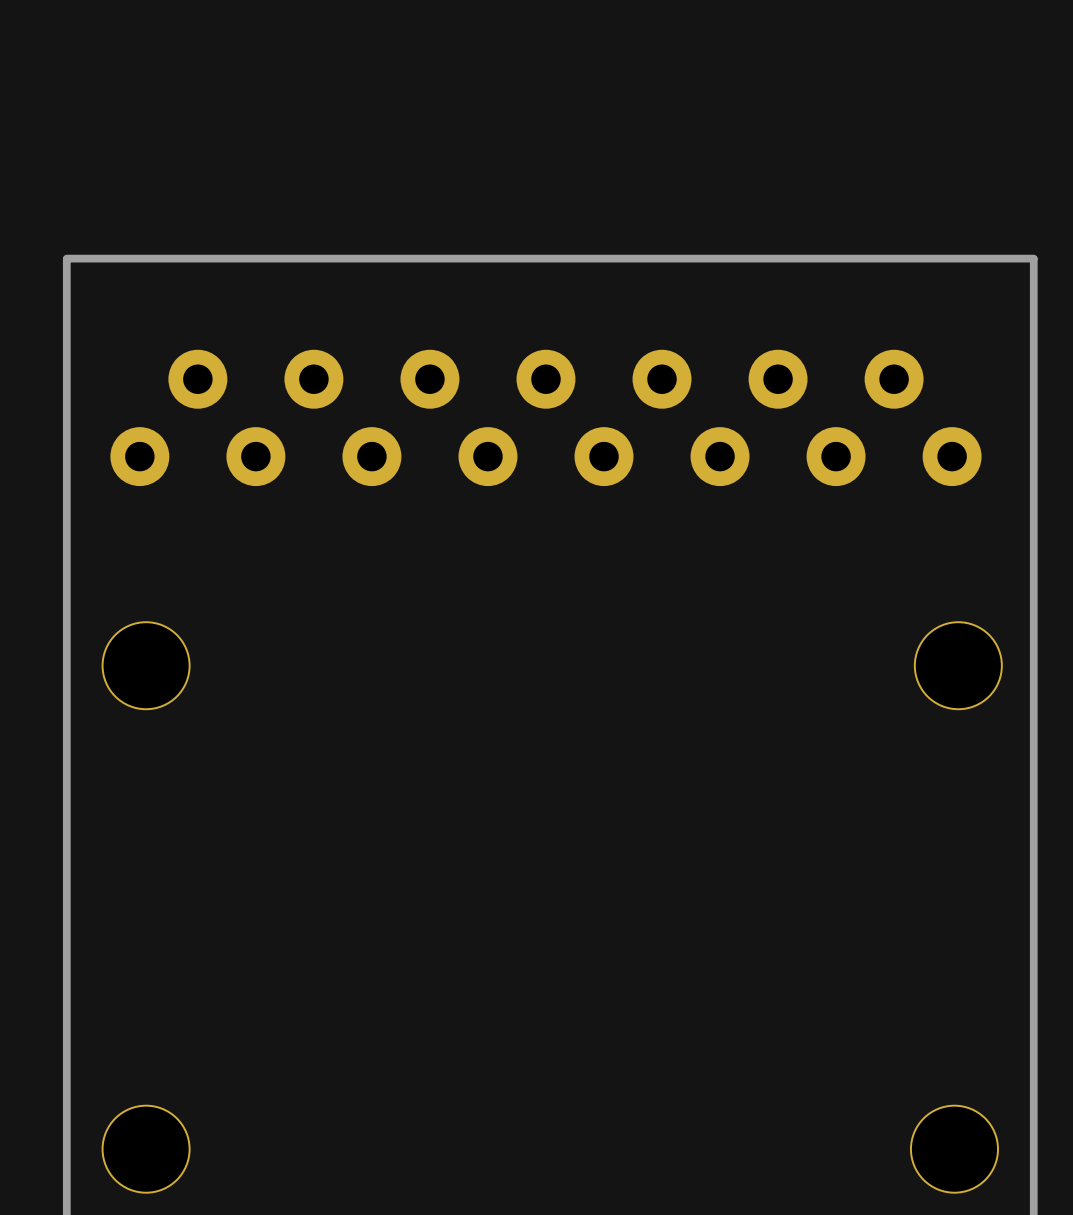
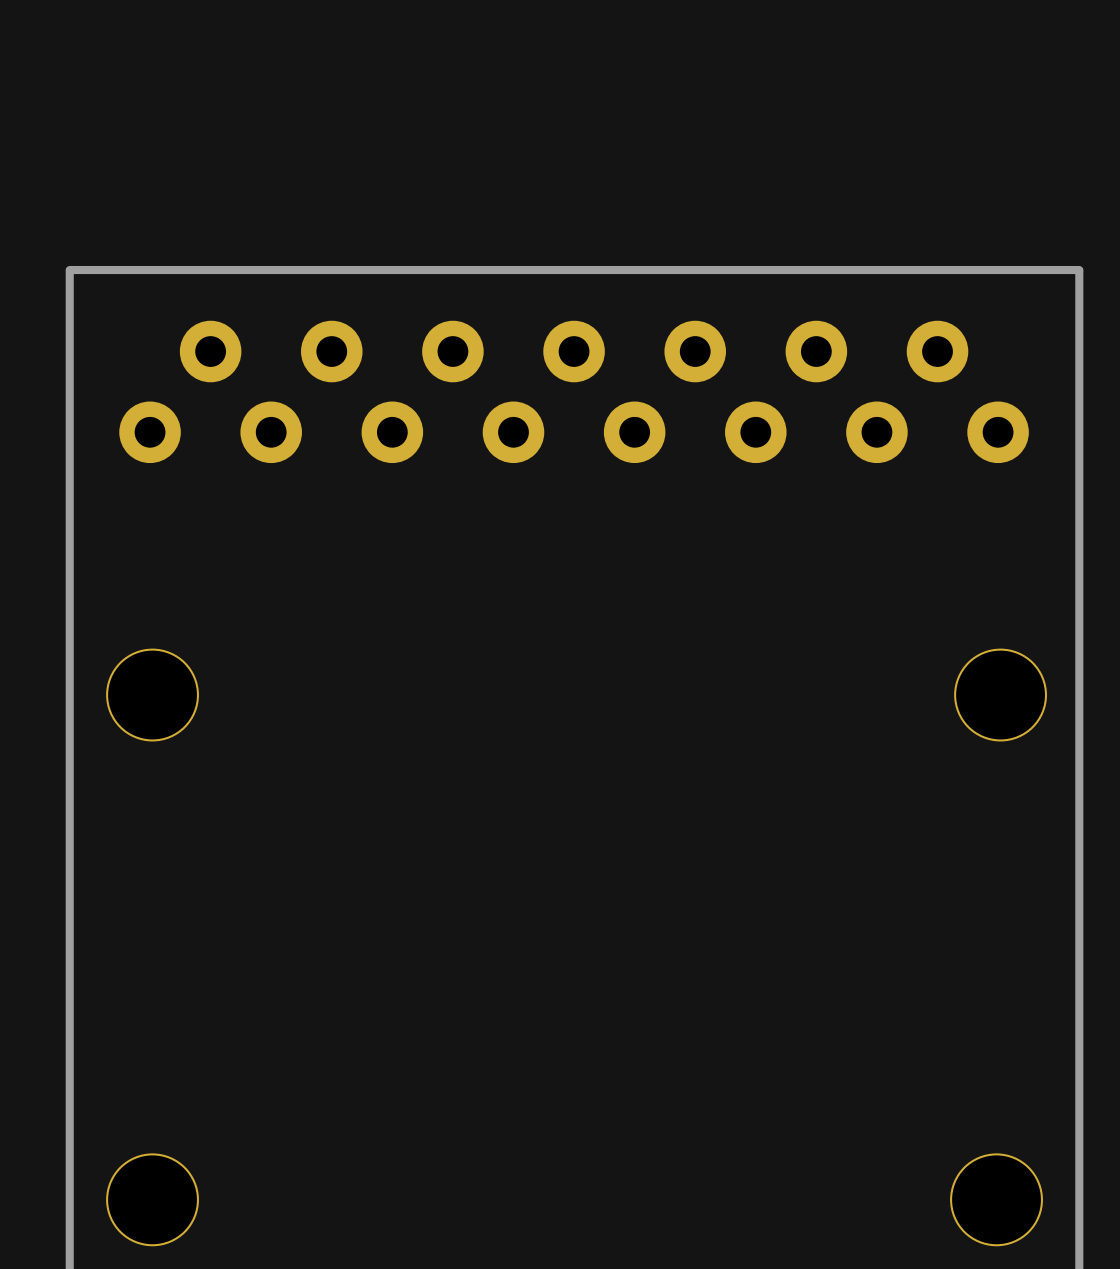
part position: (545, 417) -> (574, 391)

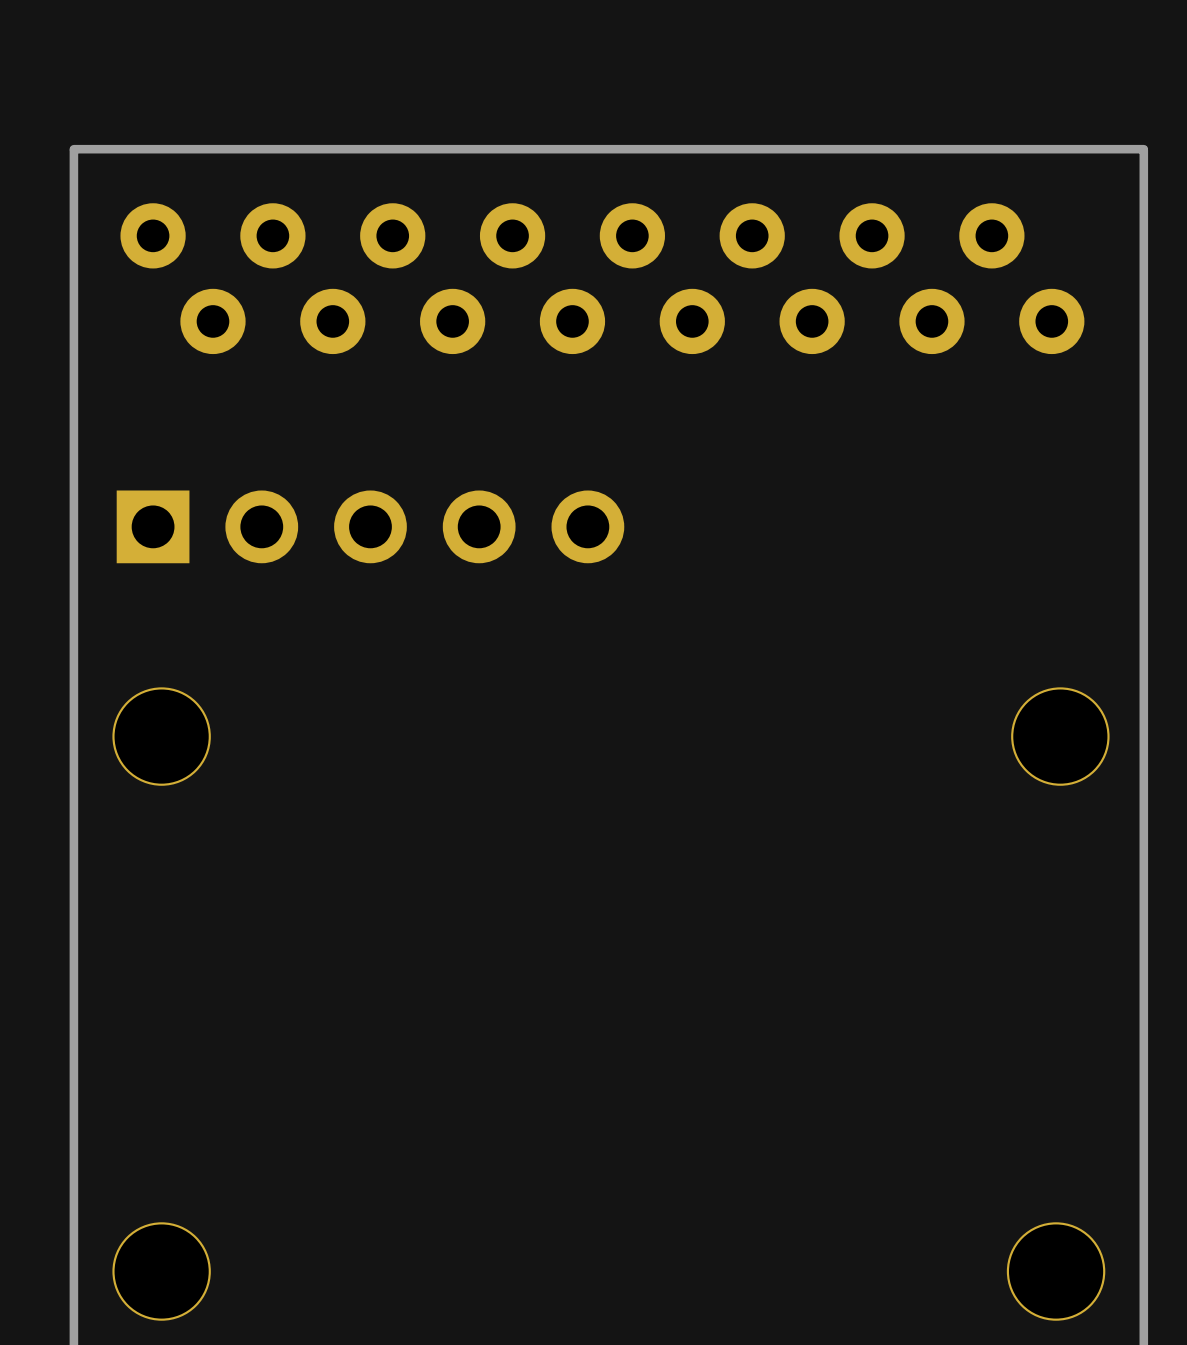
board edge: none -> (1143, 149) (73, 149)
board edge: none -> (73, 150) (73, 287)
part: none -> (602, 278)
board edge: (1079, 270) (69, 270) -> (1143, 287) (1143, 150)
part: (574, 391) -> none
part: none -> (370, 526)

